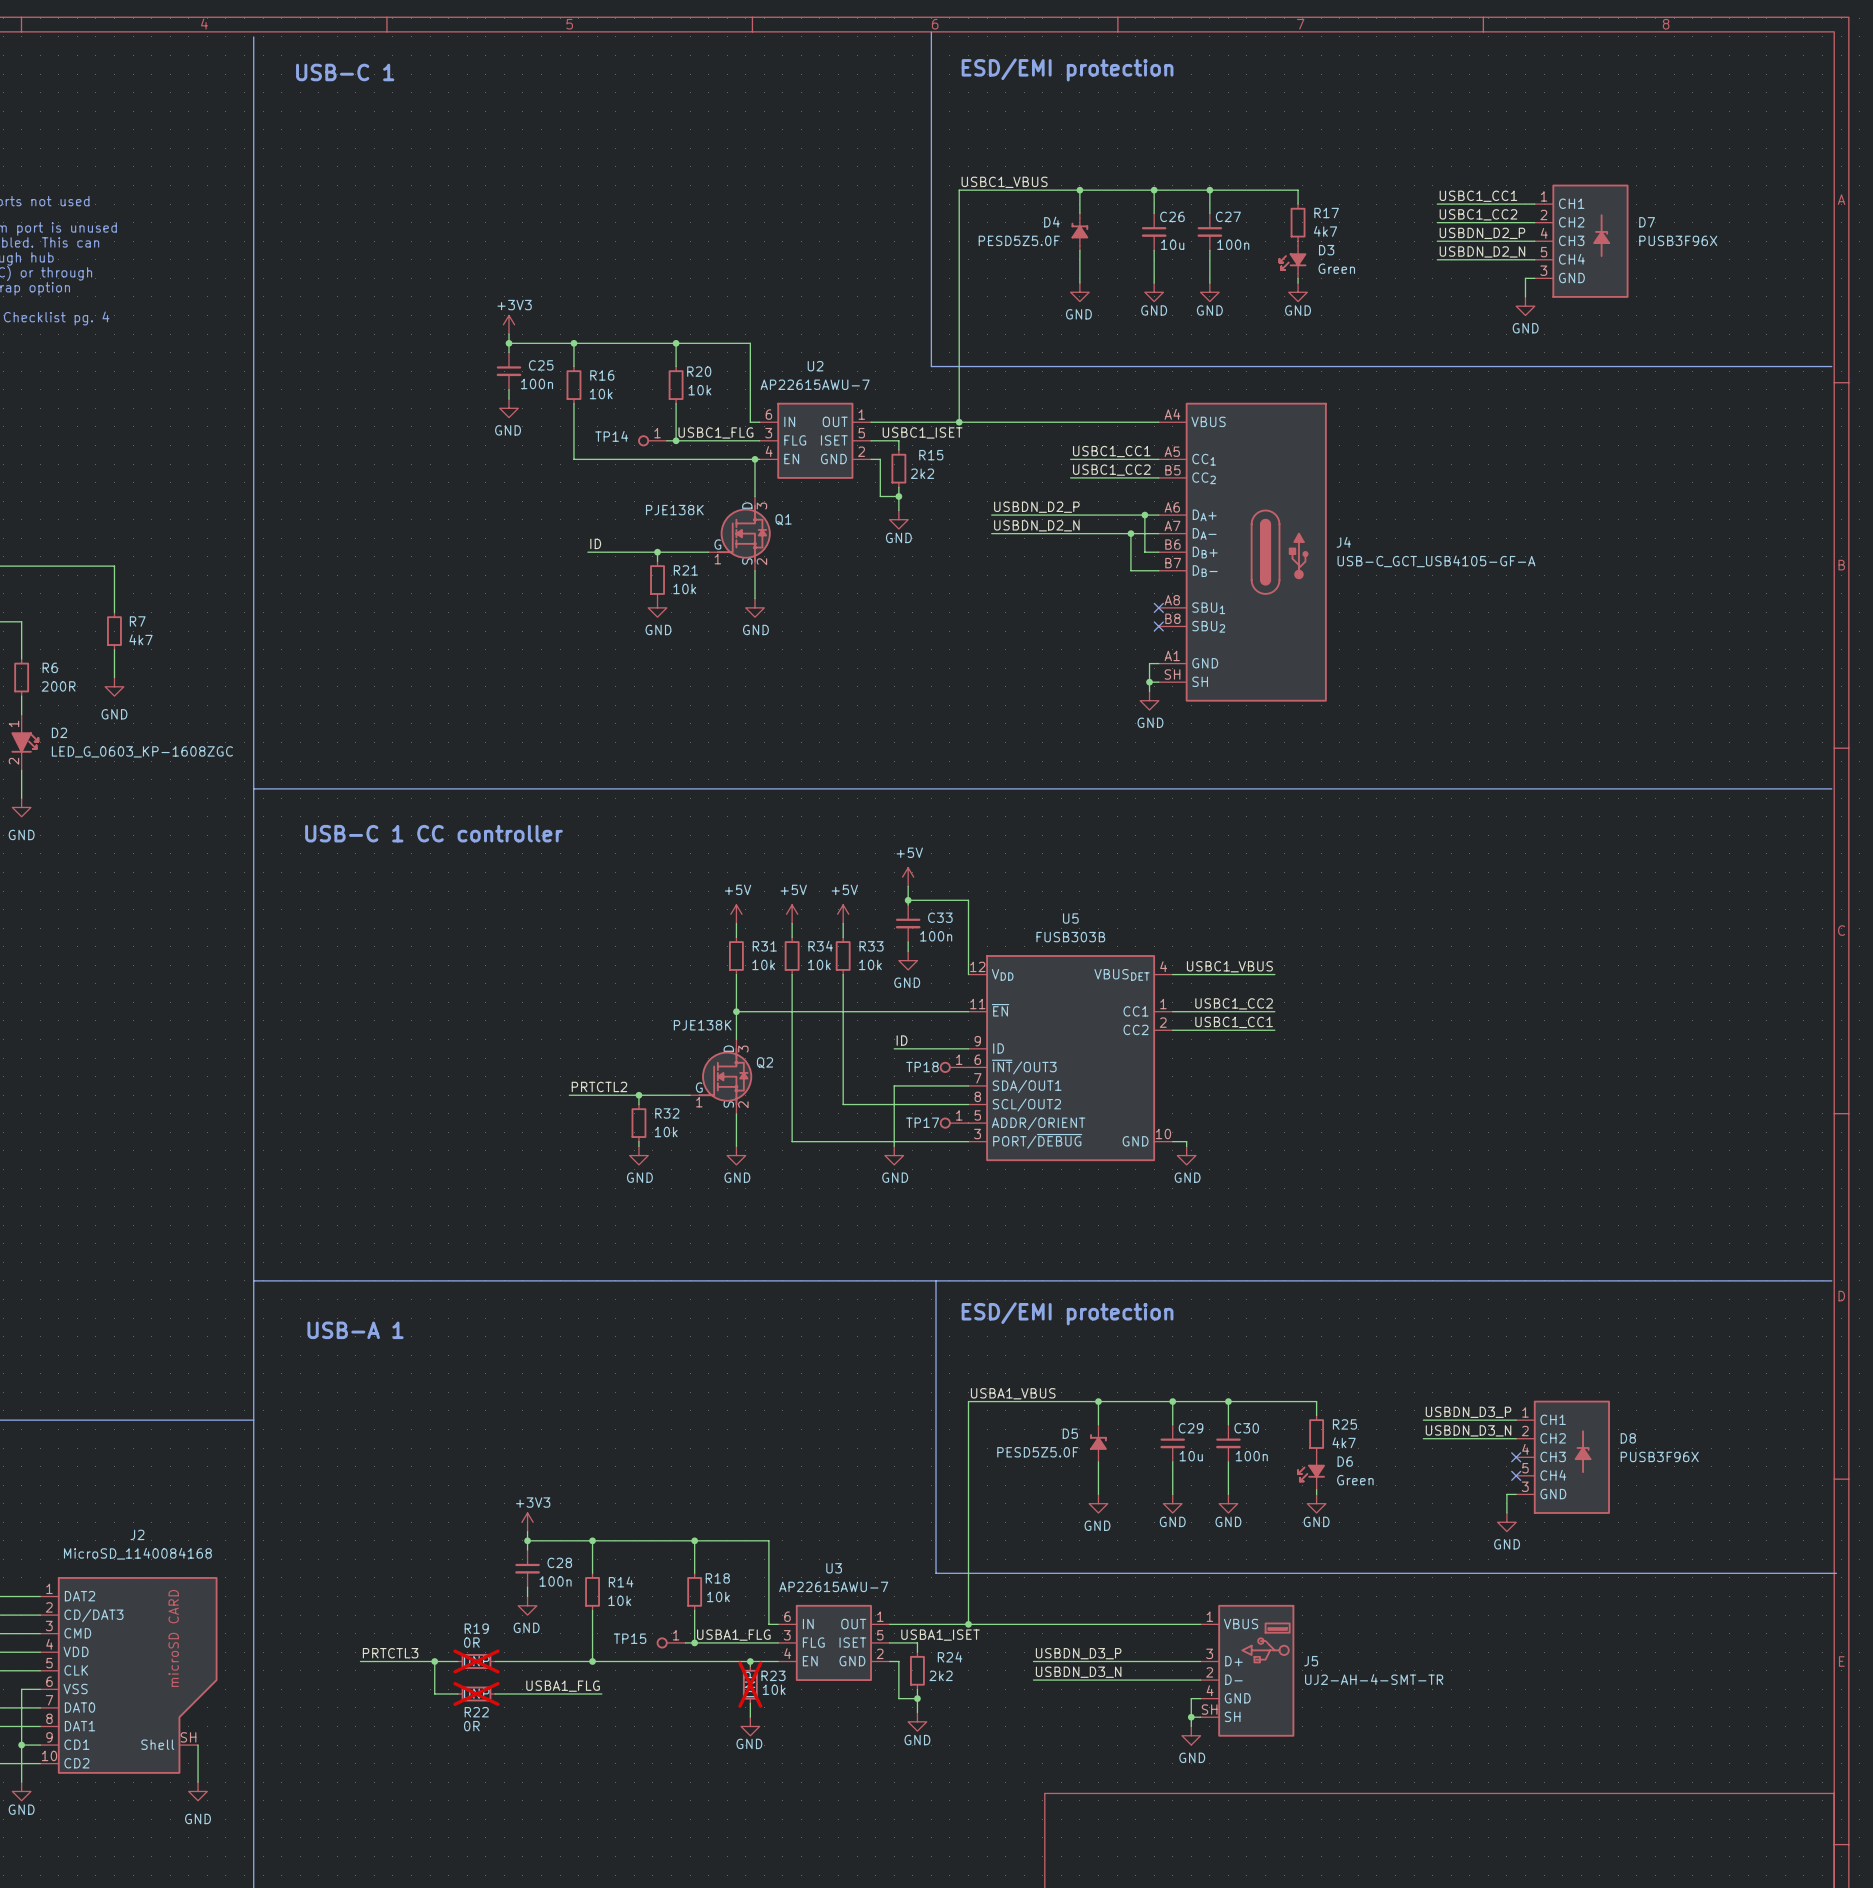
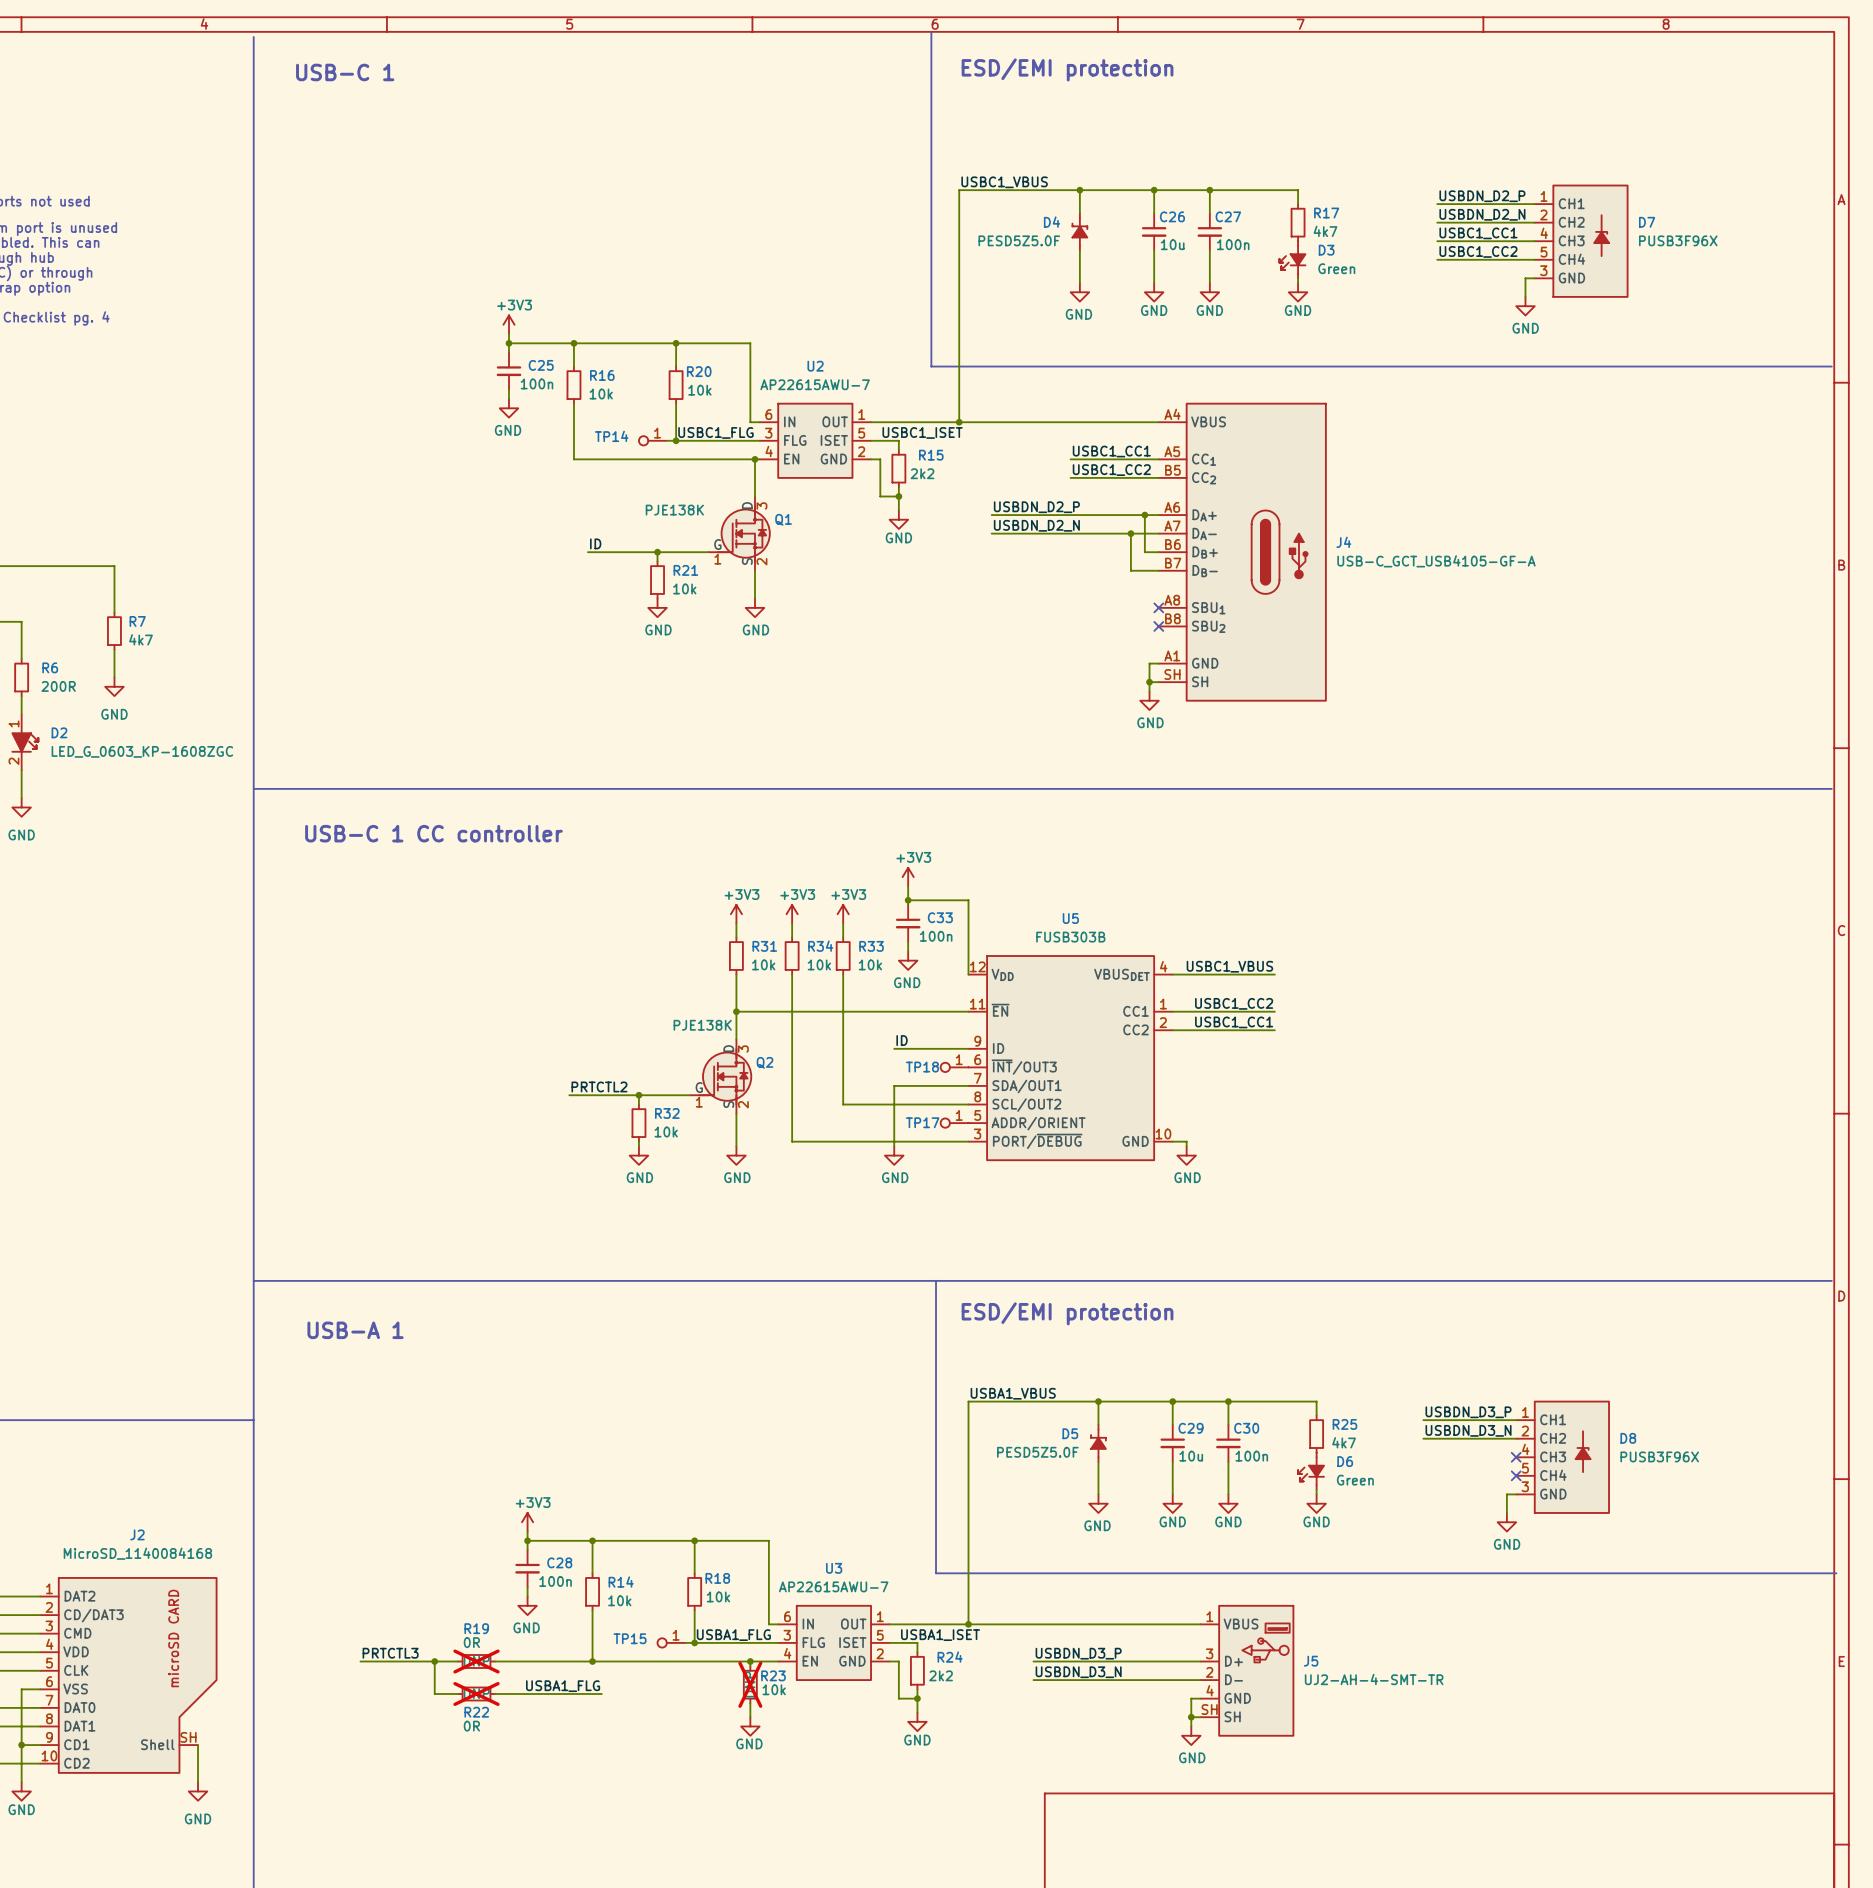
label: USBC1_CC1 (1478, 196) -> USBDN_D2_P (1482, 196)
label: USBC1_CC2 (1478, 214) -> USBDN_D2_N (1482, 214)
label: USBDN_D2_P (1482, 233) -> USBC1_CC1 (1478, 233)
label: USBDN_D2_N (1482, 251) -> USBC1_CC2 (1478, 251)
power symbol: +5V (908, 877) -> +3V3 (908, 877)
power symbol: +5V (736, 914) -> +3V3 (736, 914)
power symbol: +5V (792, 914) -> +3V3 (792, 914)
power symbol: +5V (843, 914) -> +3V3 (843, 914)

